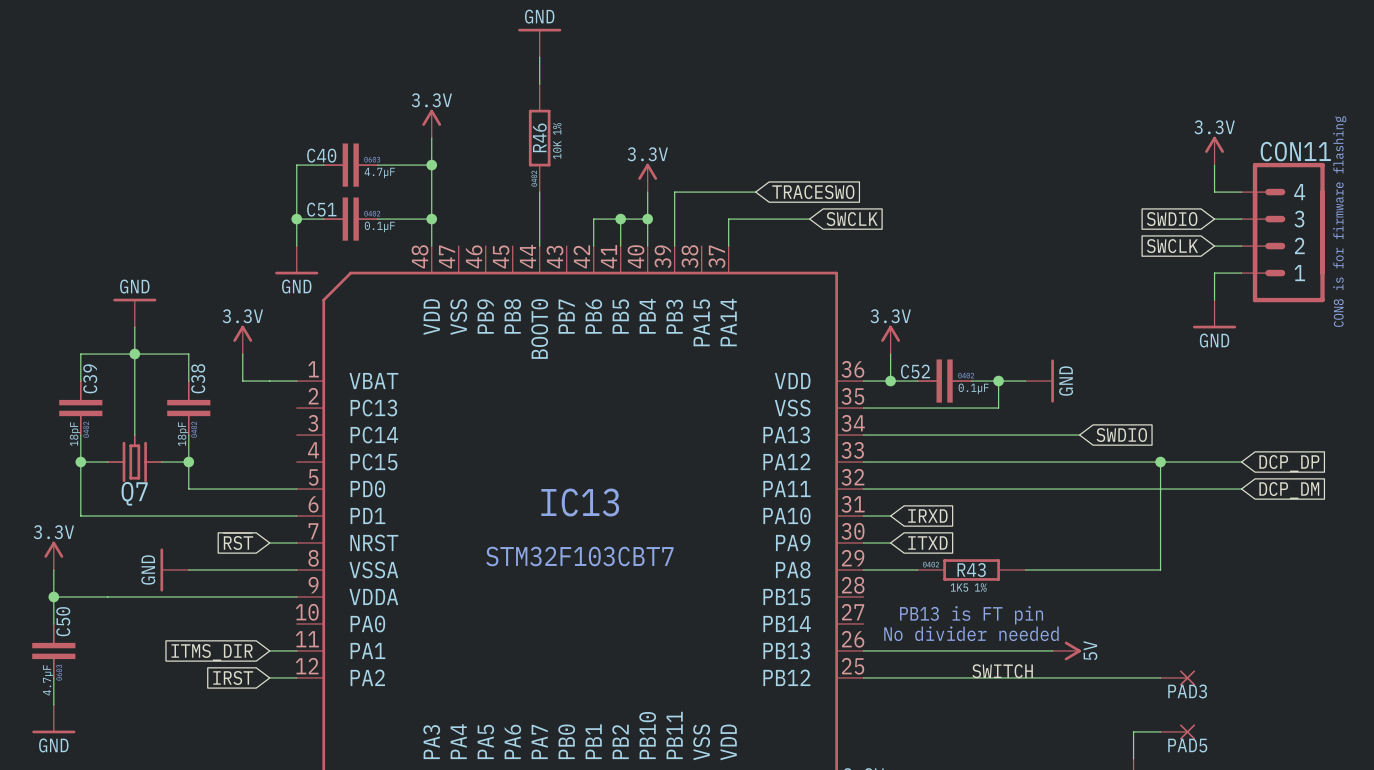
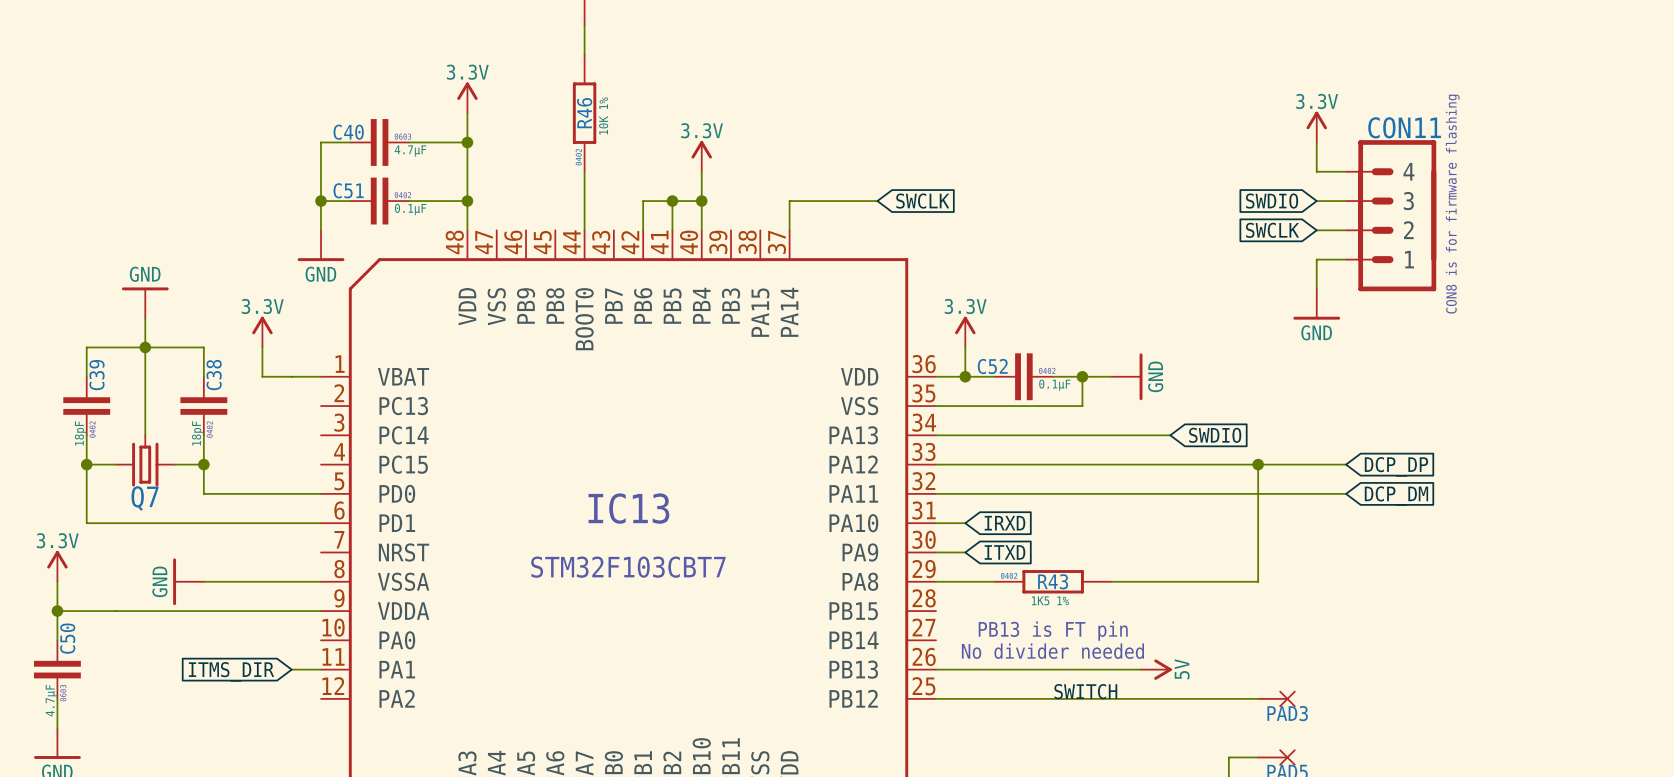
wire: (755, 192) (674, 192) (674, 246) -> none
global label: TRACESWO (813, 192) -> none
global label: ~{RST} (238, 541) -> none
wire: (269, 543) (296, 543) -> none
global label: IRST (233, 677) -> none
wire: (269, 677) (296, 677) -> none

